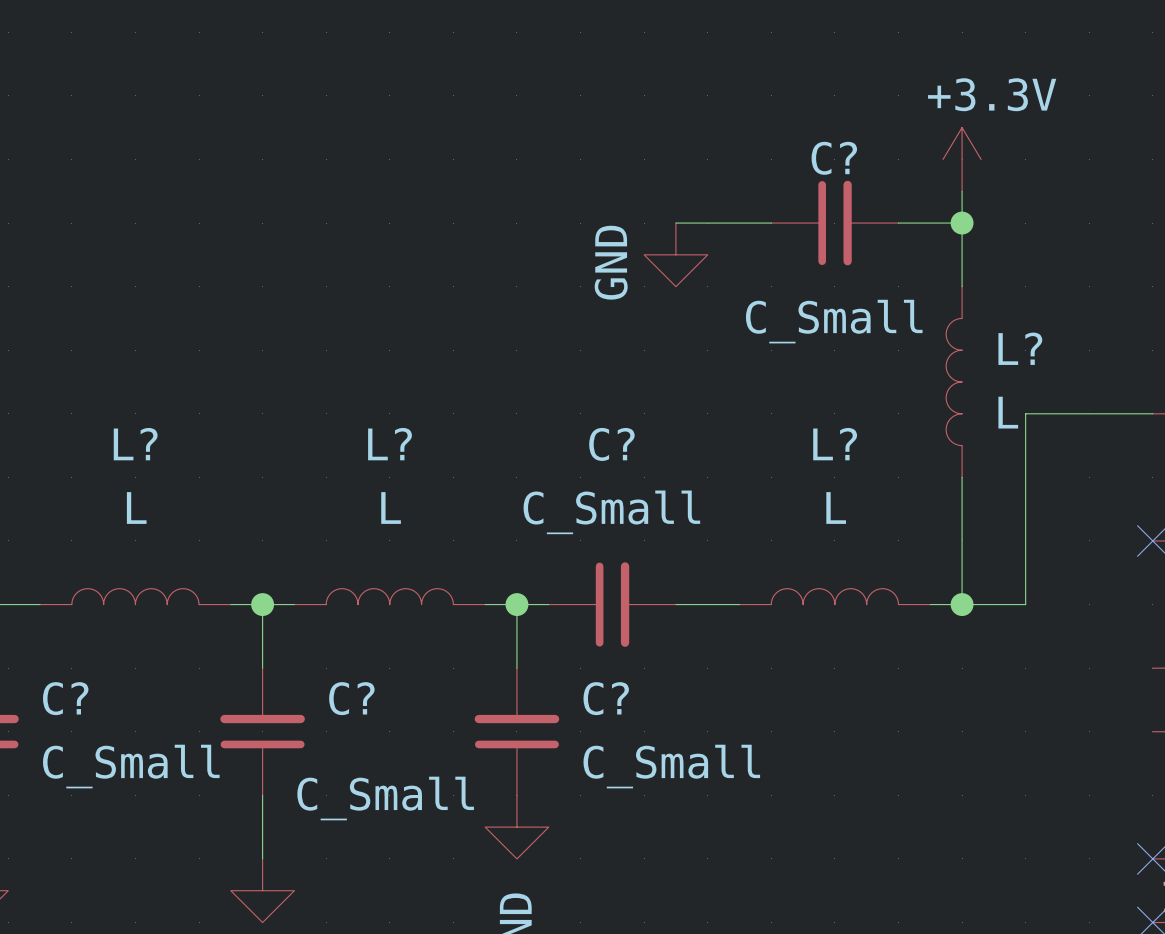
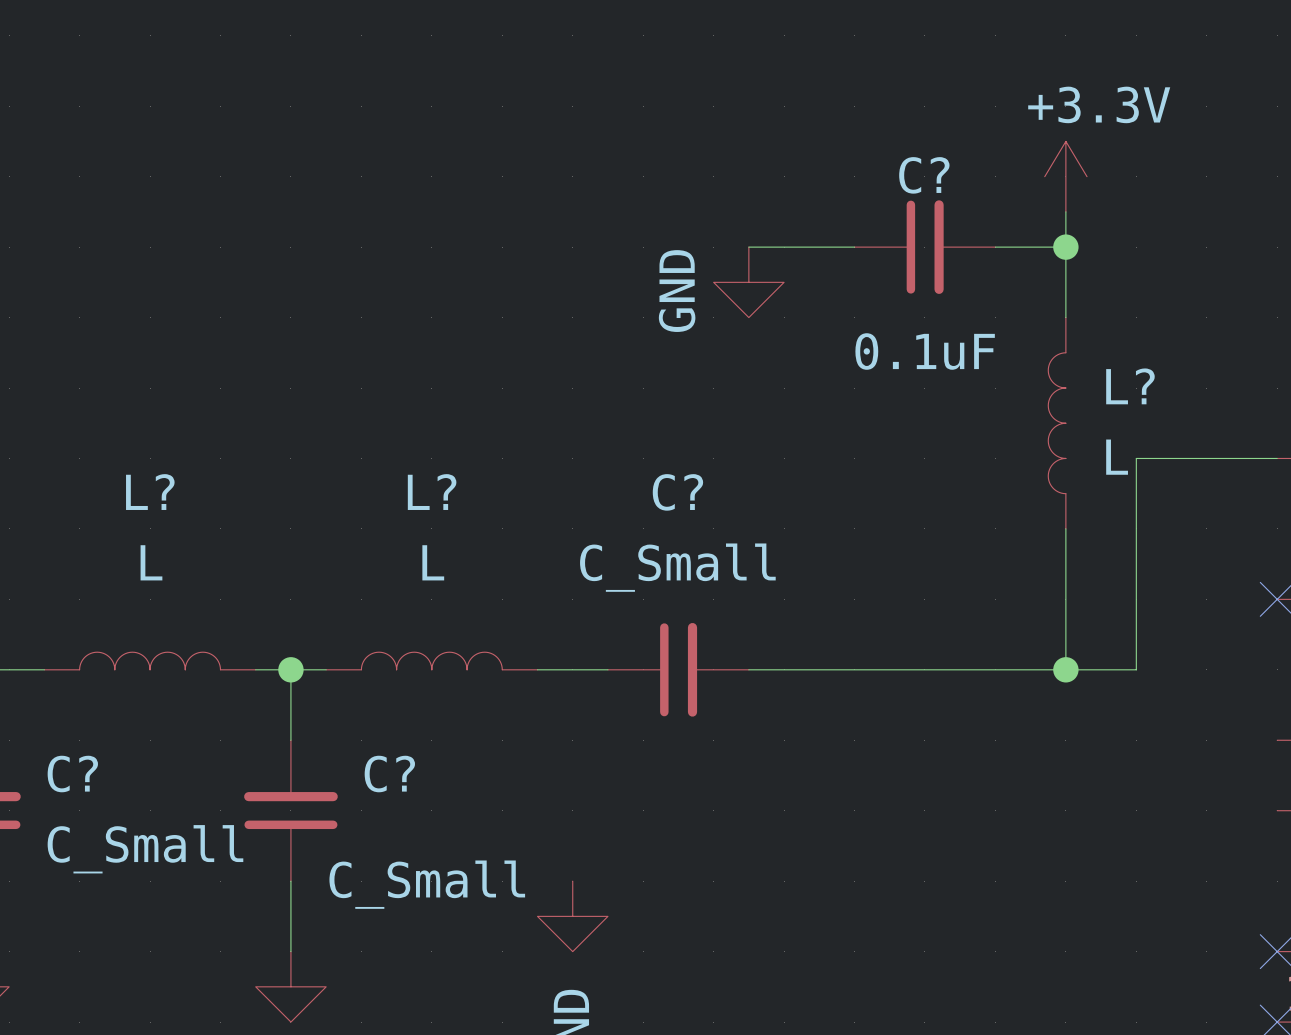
C? value: C_Small (834, 321) -> 0.1uF (925, 351)
L?: L (834, 596) -> none
wire: (516, 604) (516, 668) -> none
junction: (516, 604) -> none
wire: none -> (819, 669) (1030, 669)
C?: C_Small (516, 731) -> none

